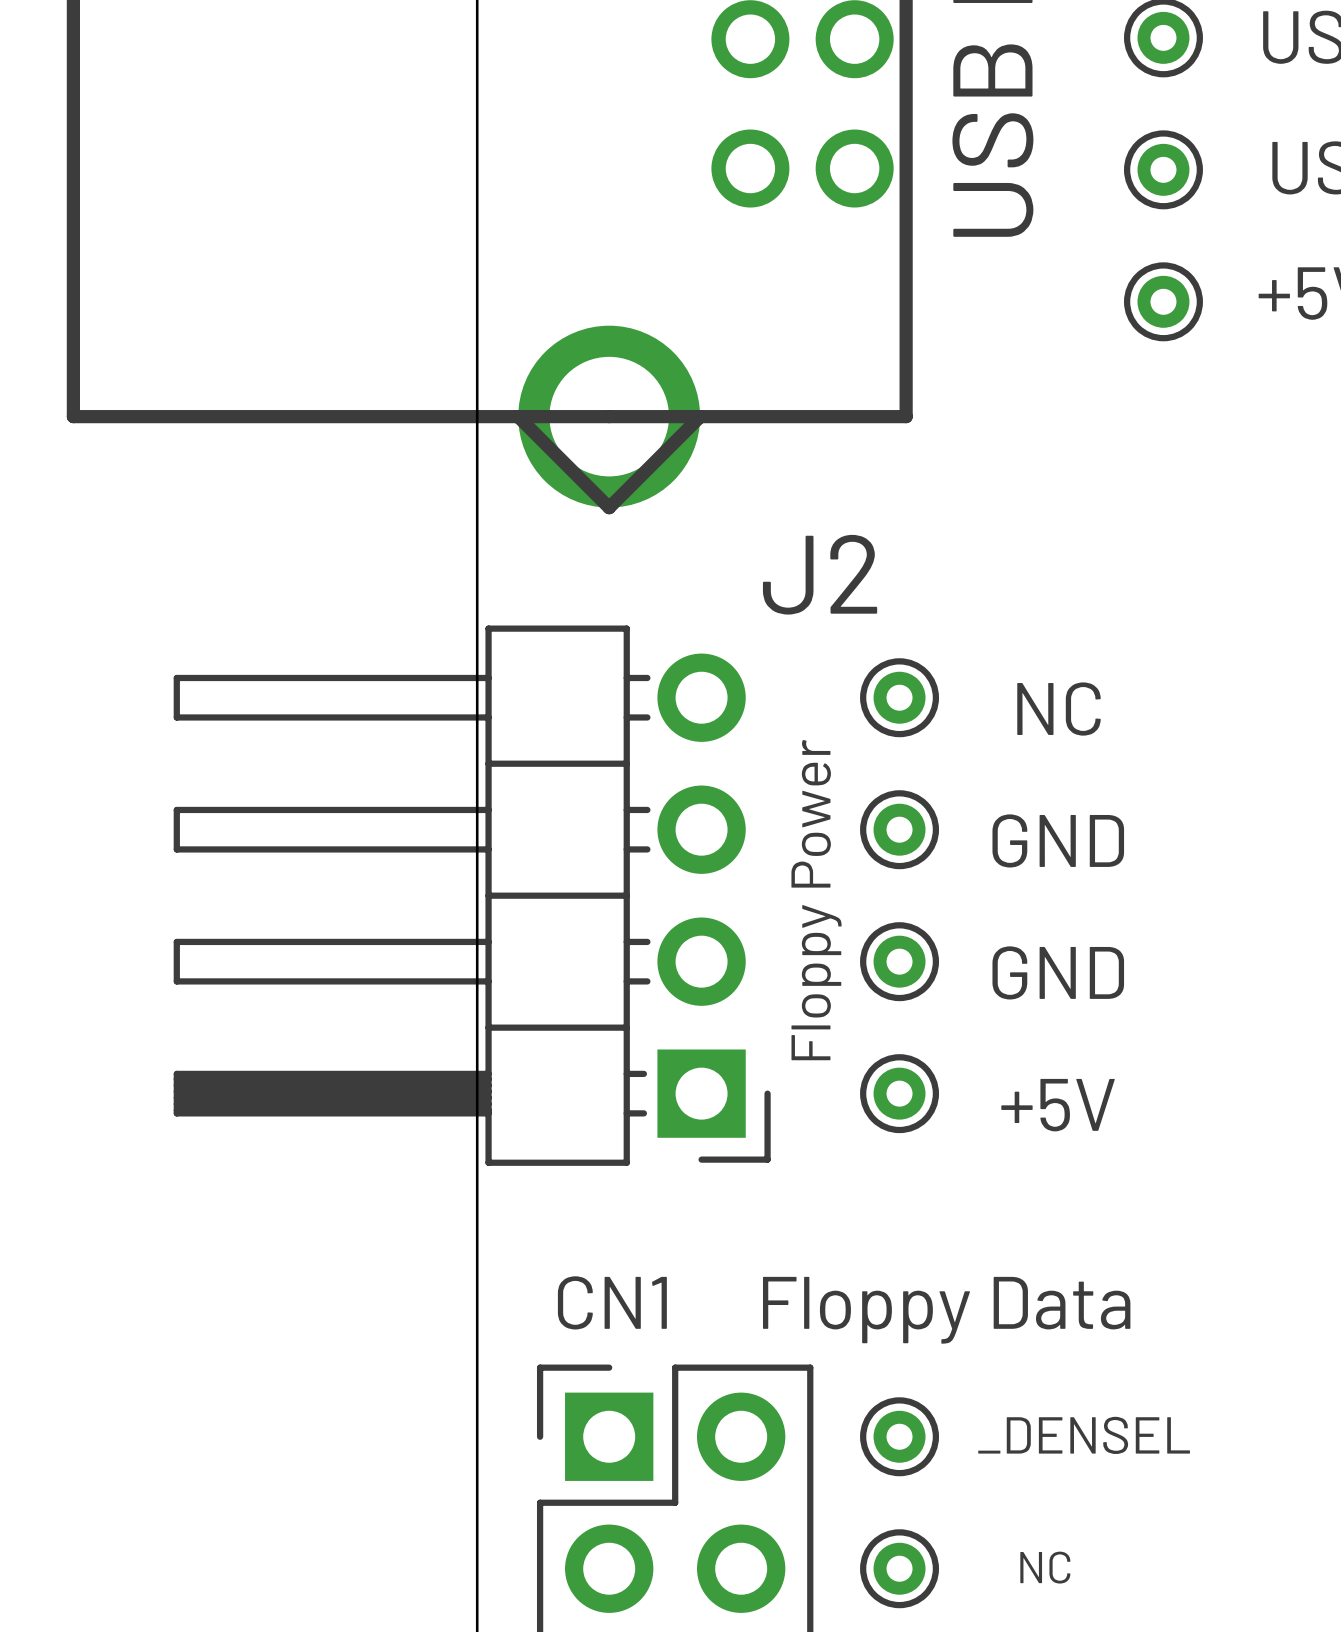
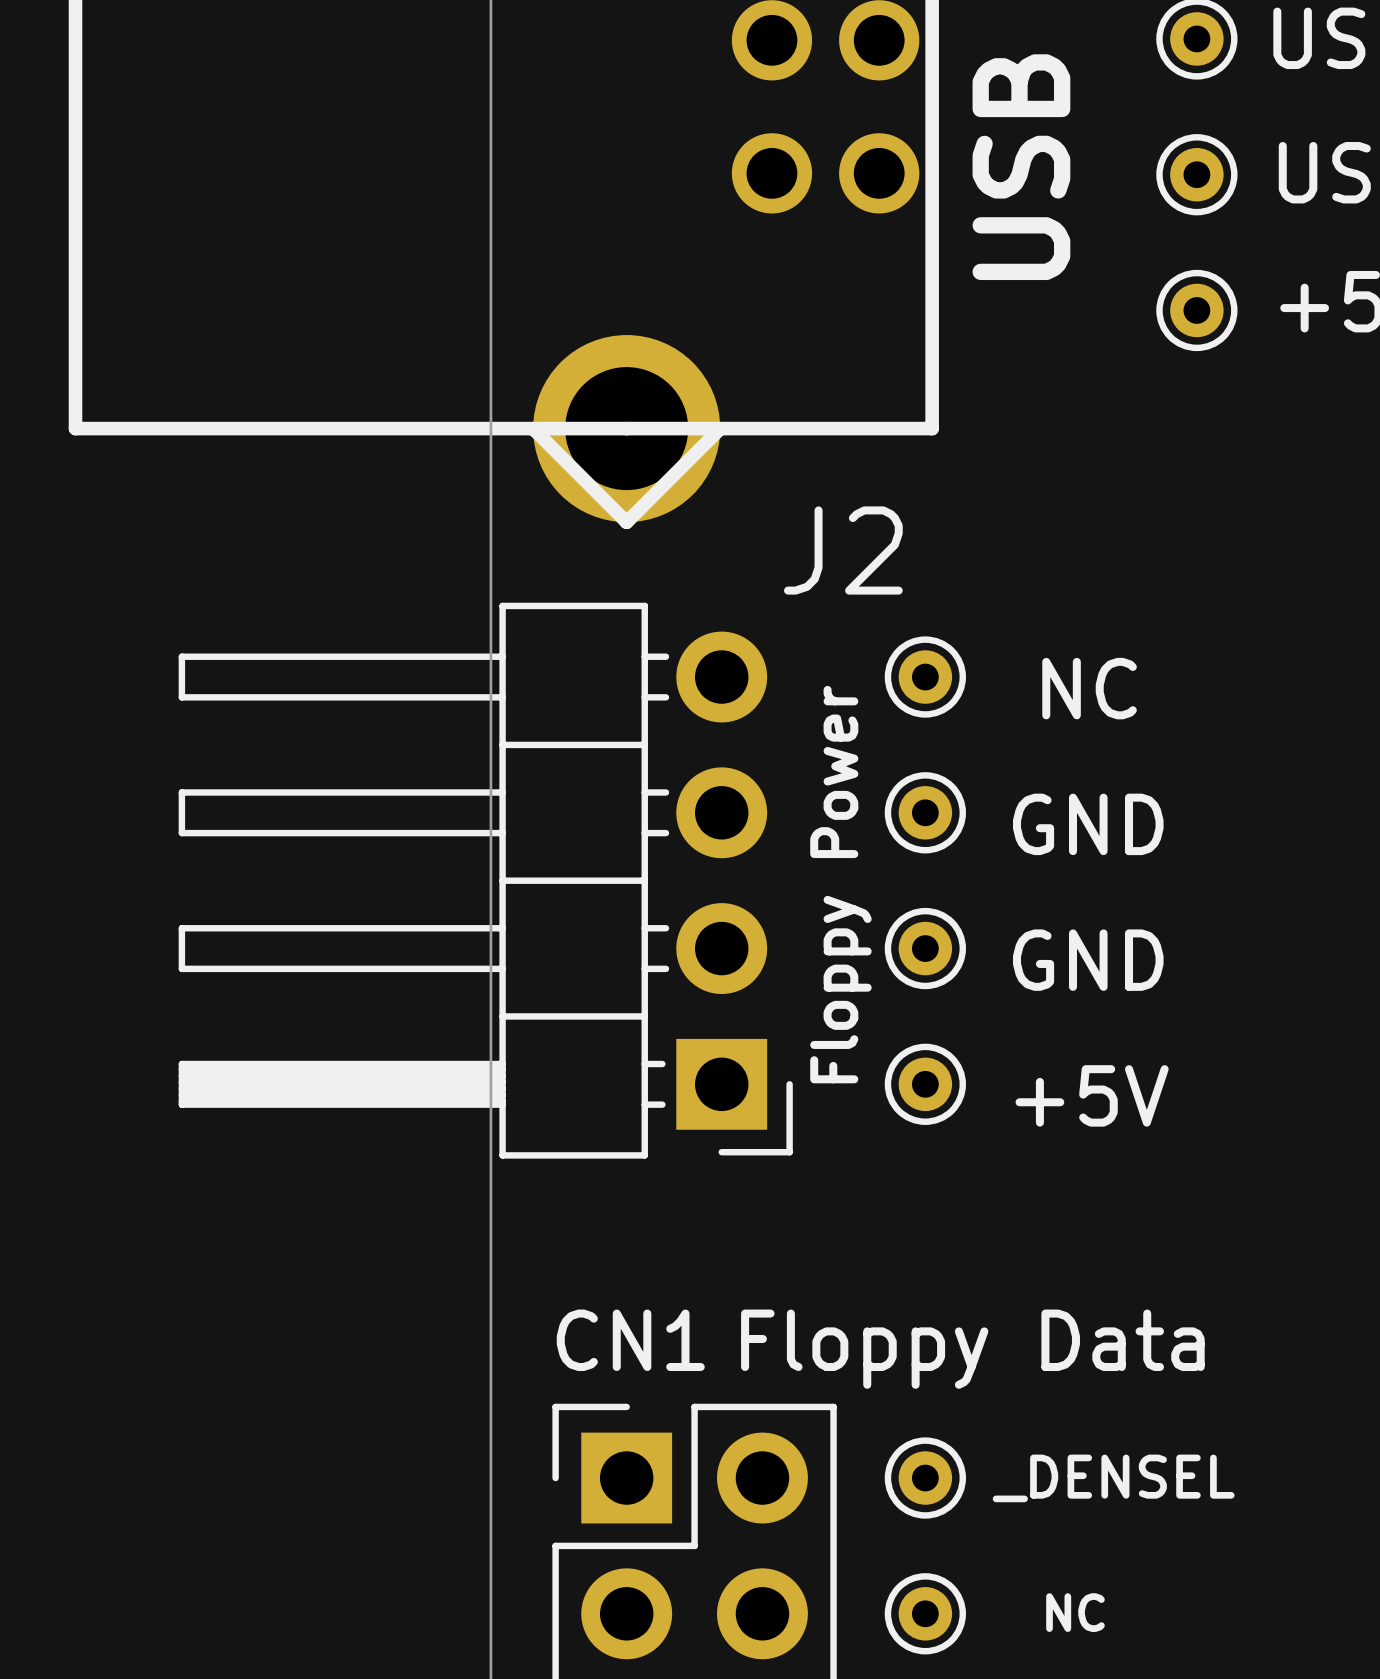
part position: (899, 697) -> (925, 677)
text position: NC (1058, 709) -> NC (1089, 688)
part position: (899, 829) -> (925, 812)
text position: GND (1058, 840) -> GND (1088, 824)
J2 position: (472, 895) -> (485, 880)
part position: (899, 961) -> (925, 948)
text position: GND (1058, 972) -> GND (1088, 960)
part position: (899, 1093) -> (925, 1084)
text position: +5V (1058, 1105) -> +5V (1092, 1095)

